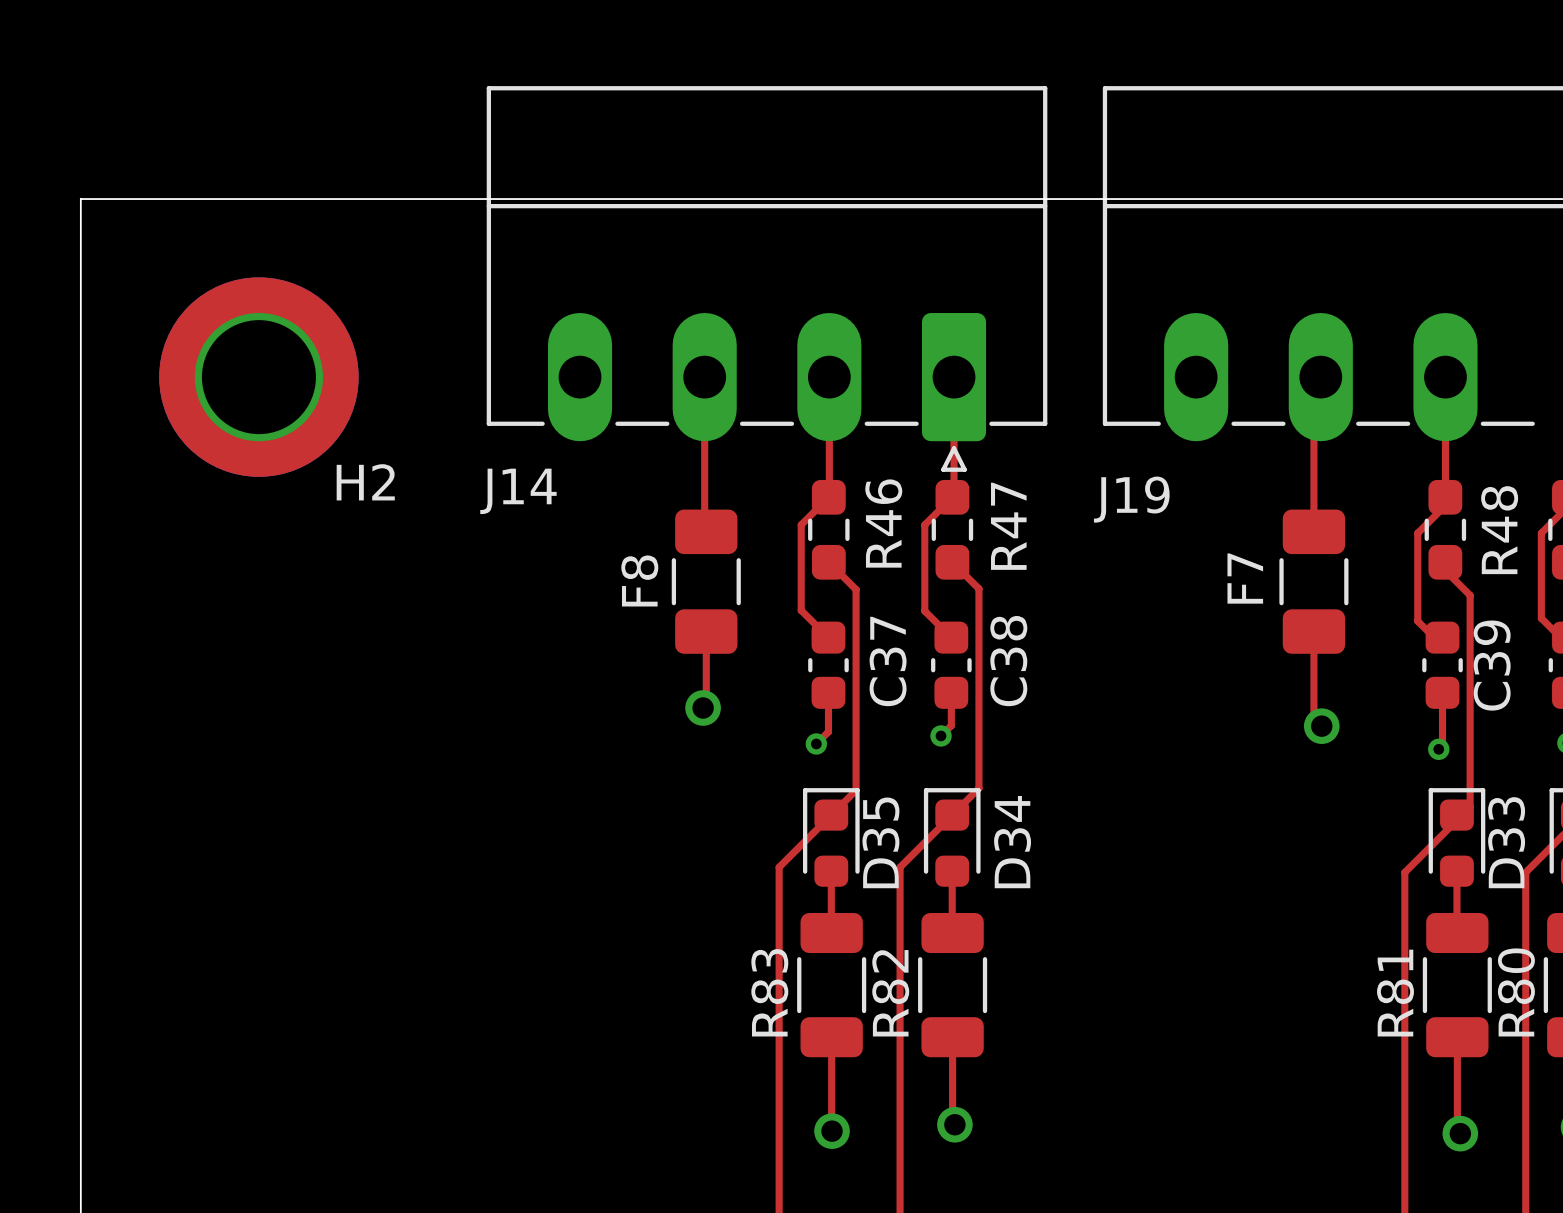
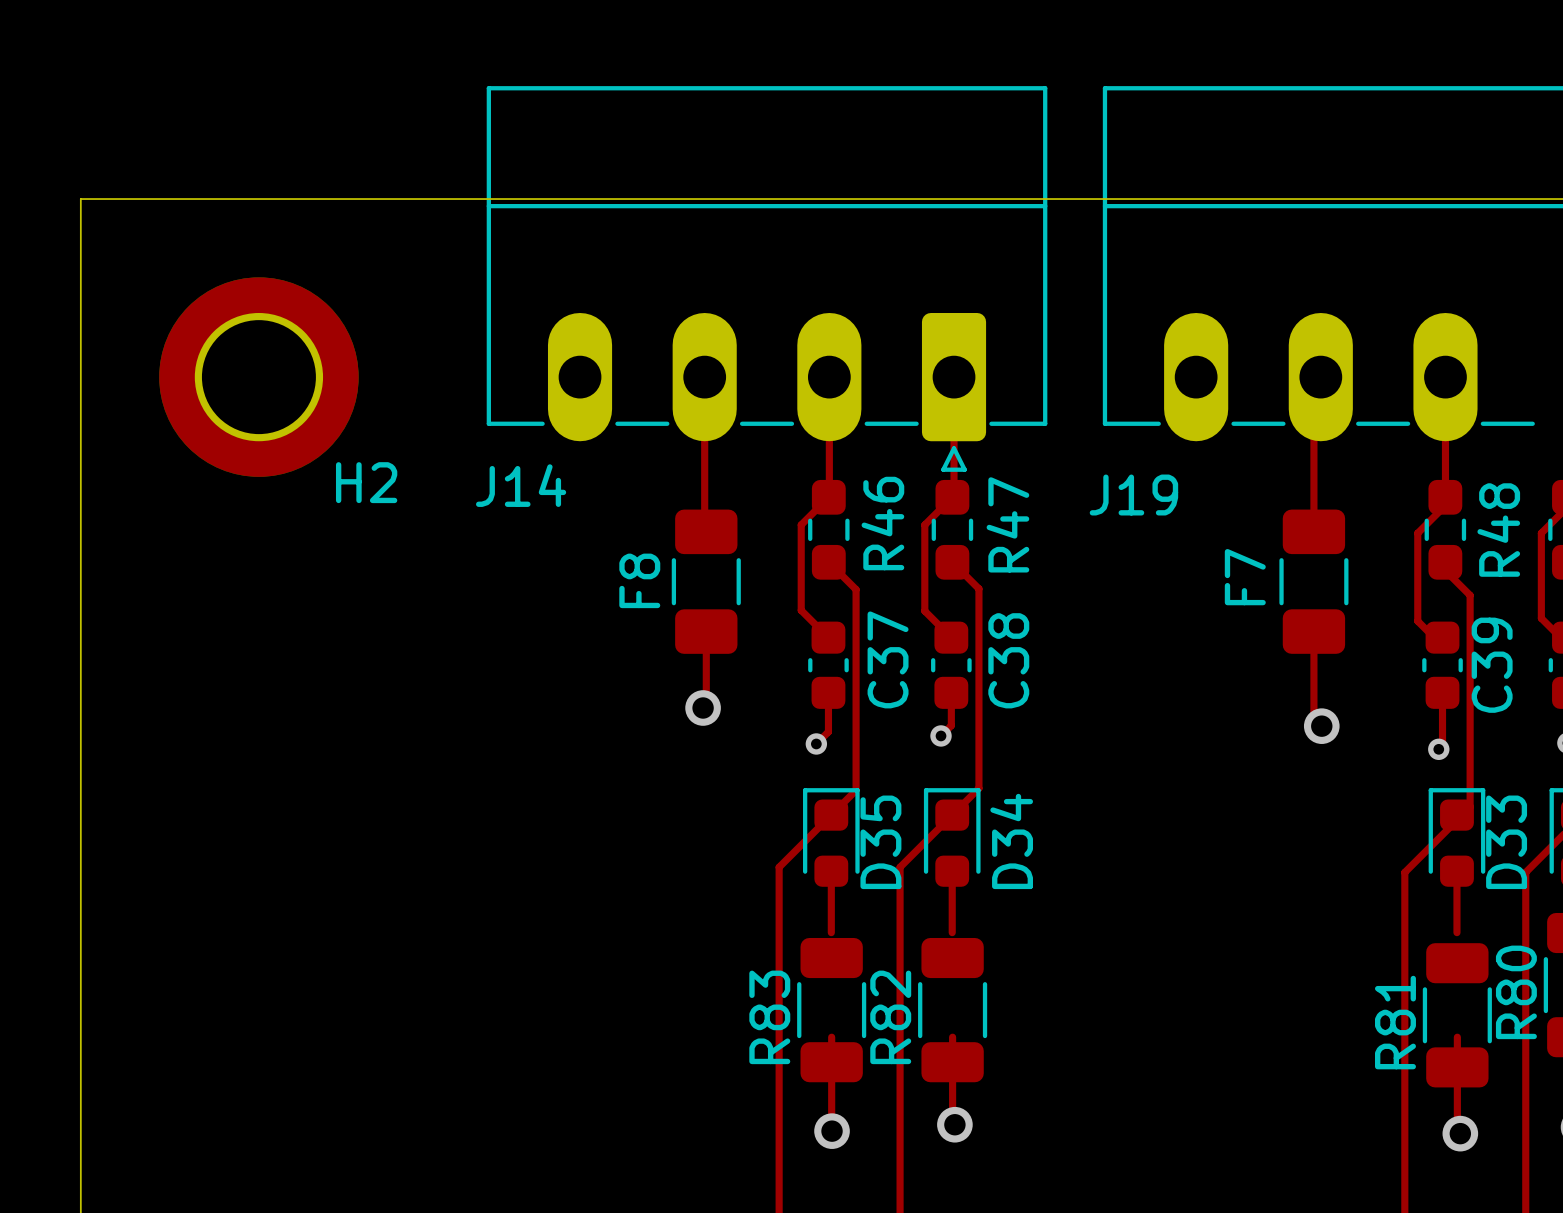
R83 position: (831, 985) -> (831, 1010)
R82 position: (952, 985) -> (952, 1010)
R81 position: (1457, 985) -> (1457, 1015)

